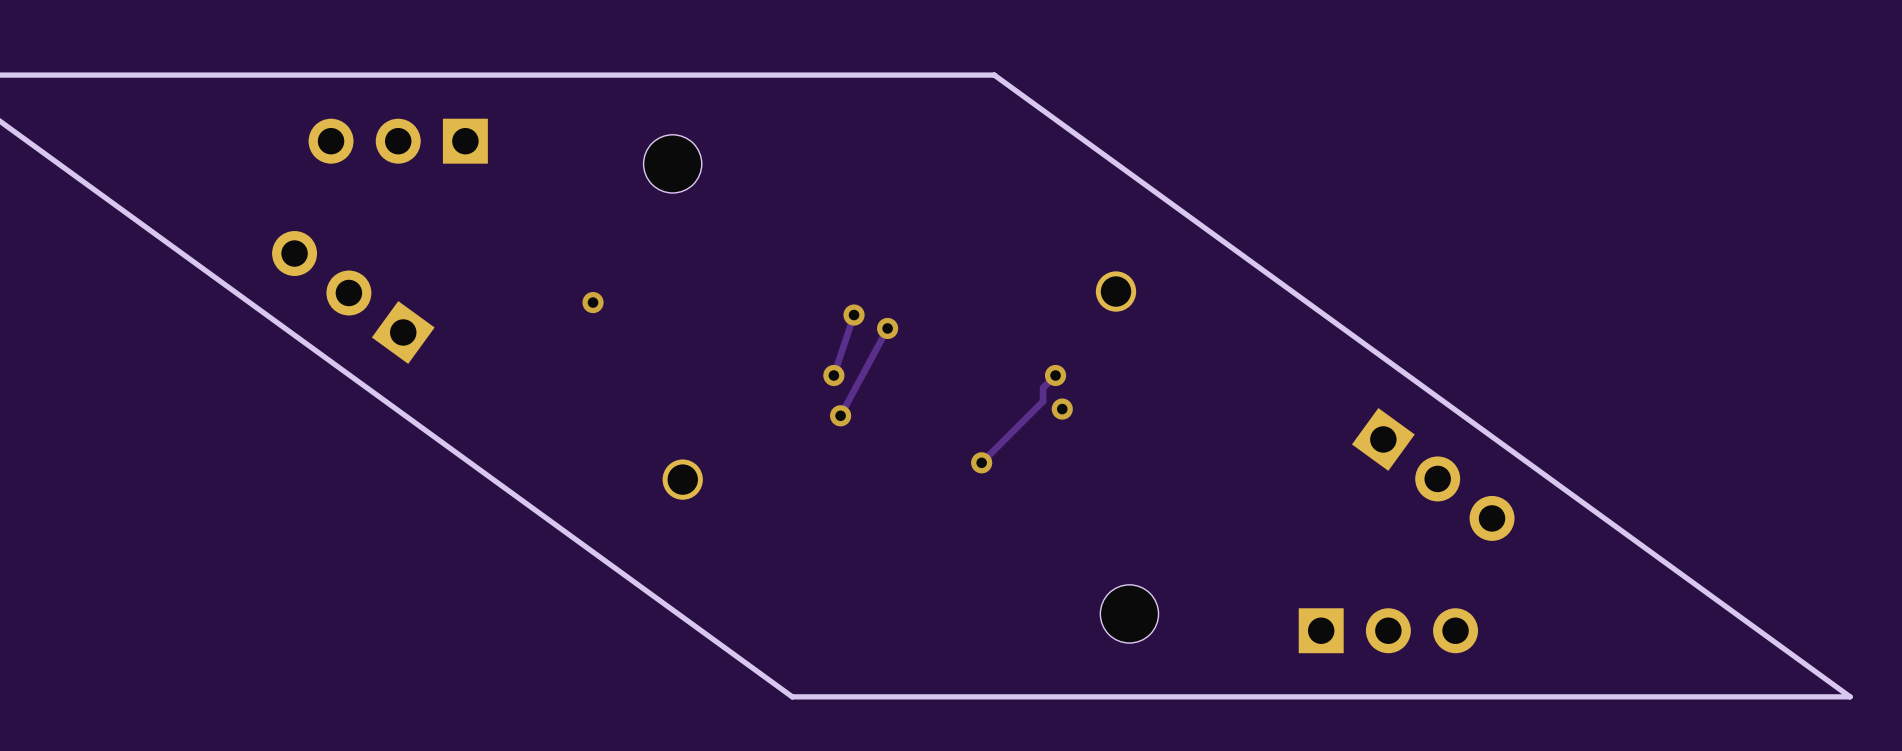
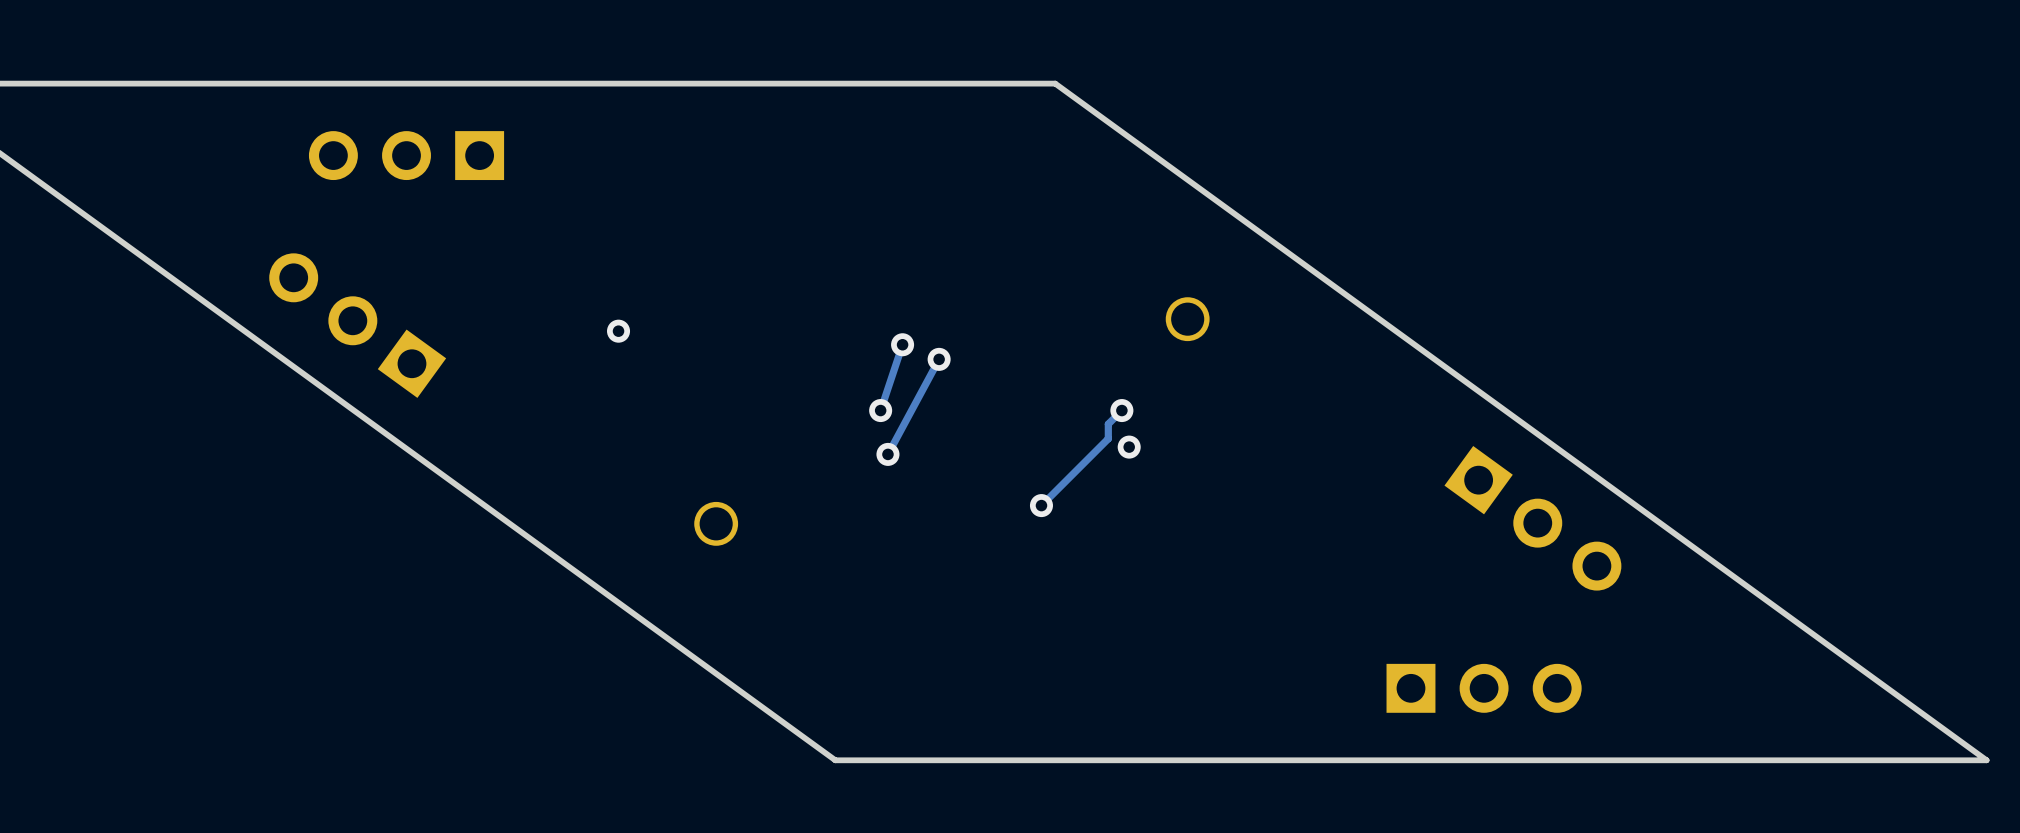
part: (672, 163) -> none
part: (1129, 613) -> none

